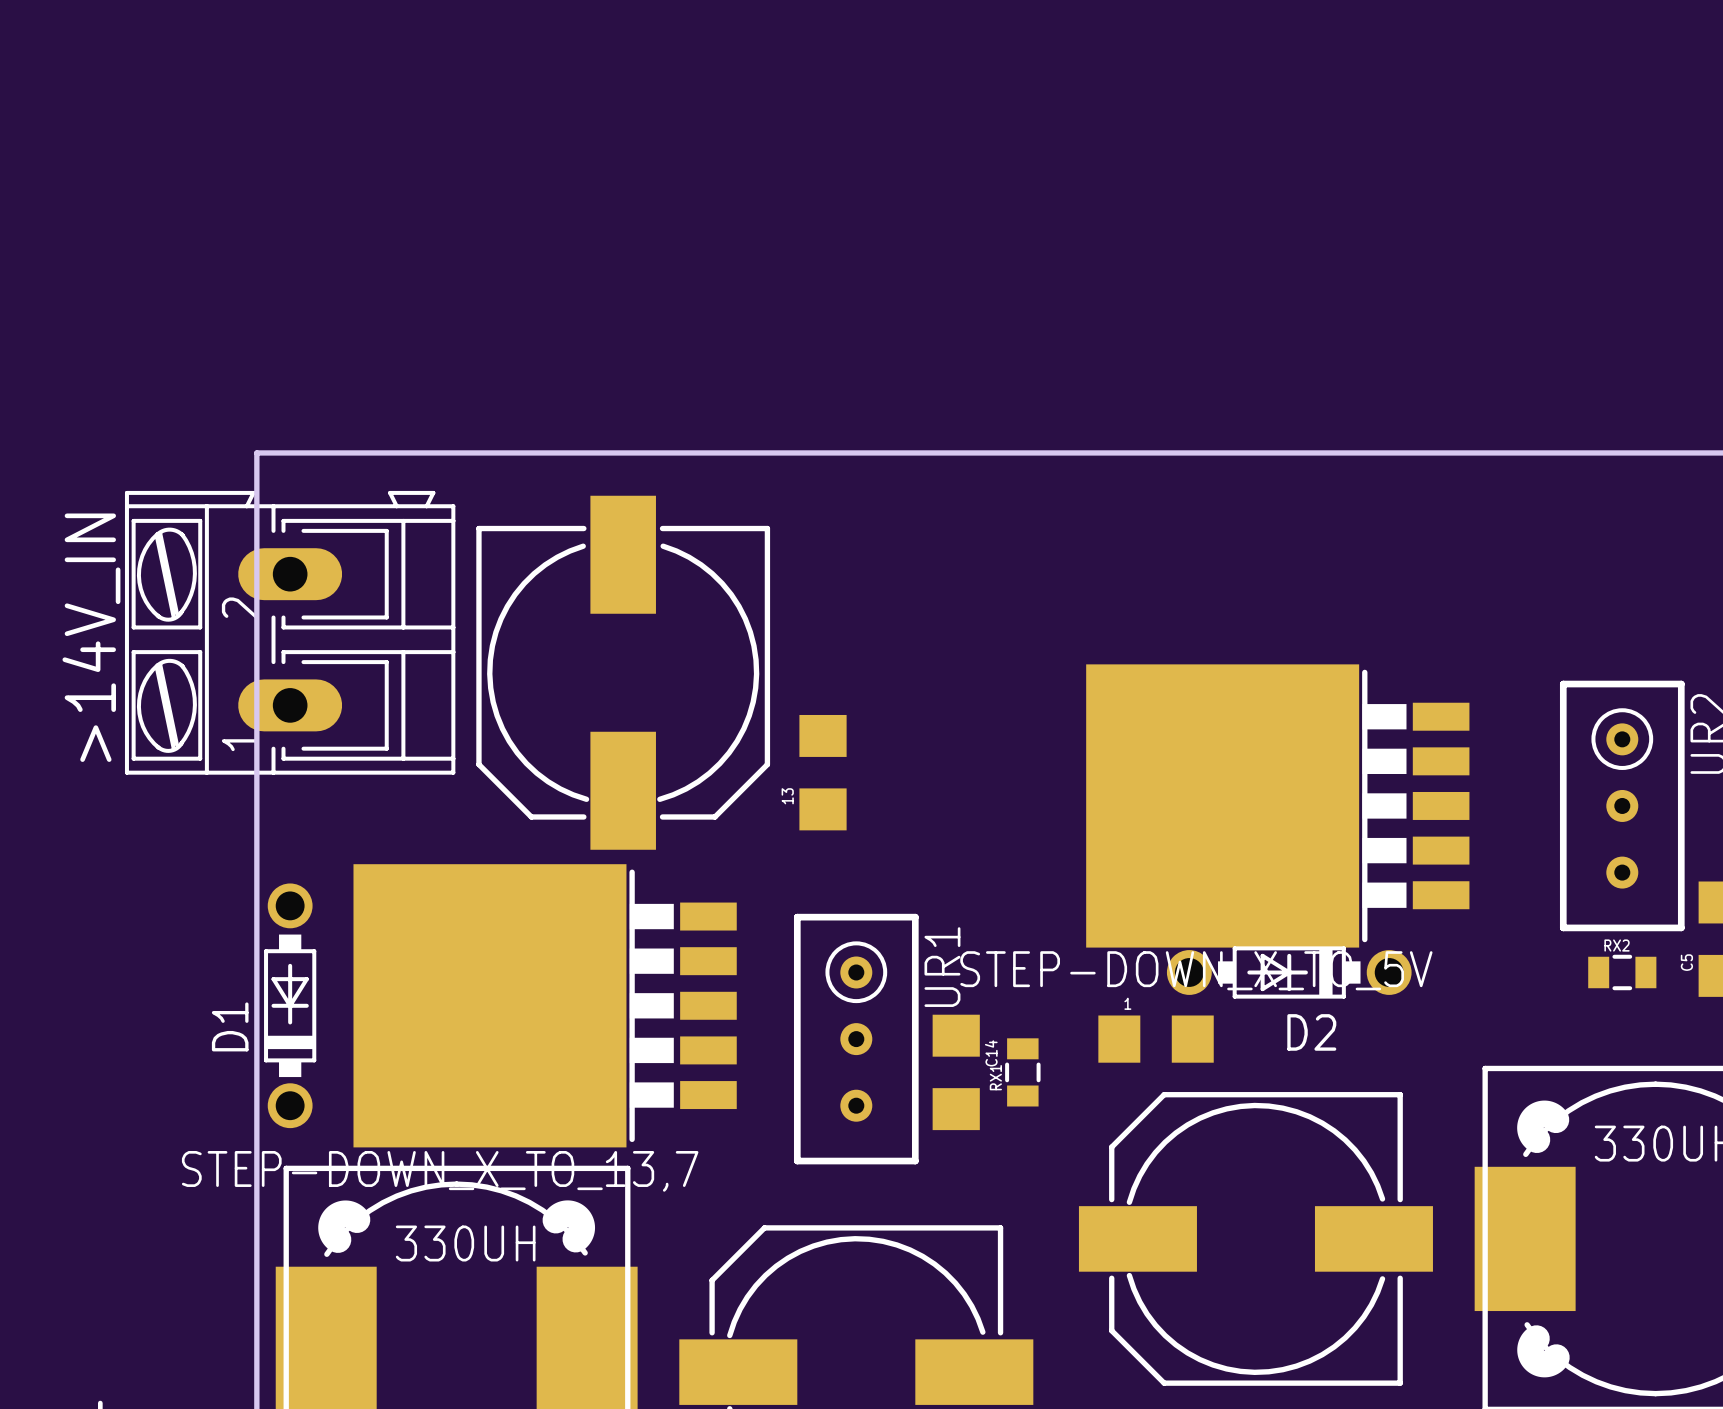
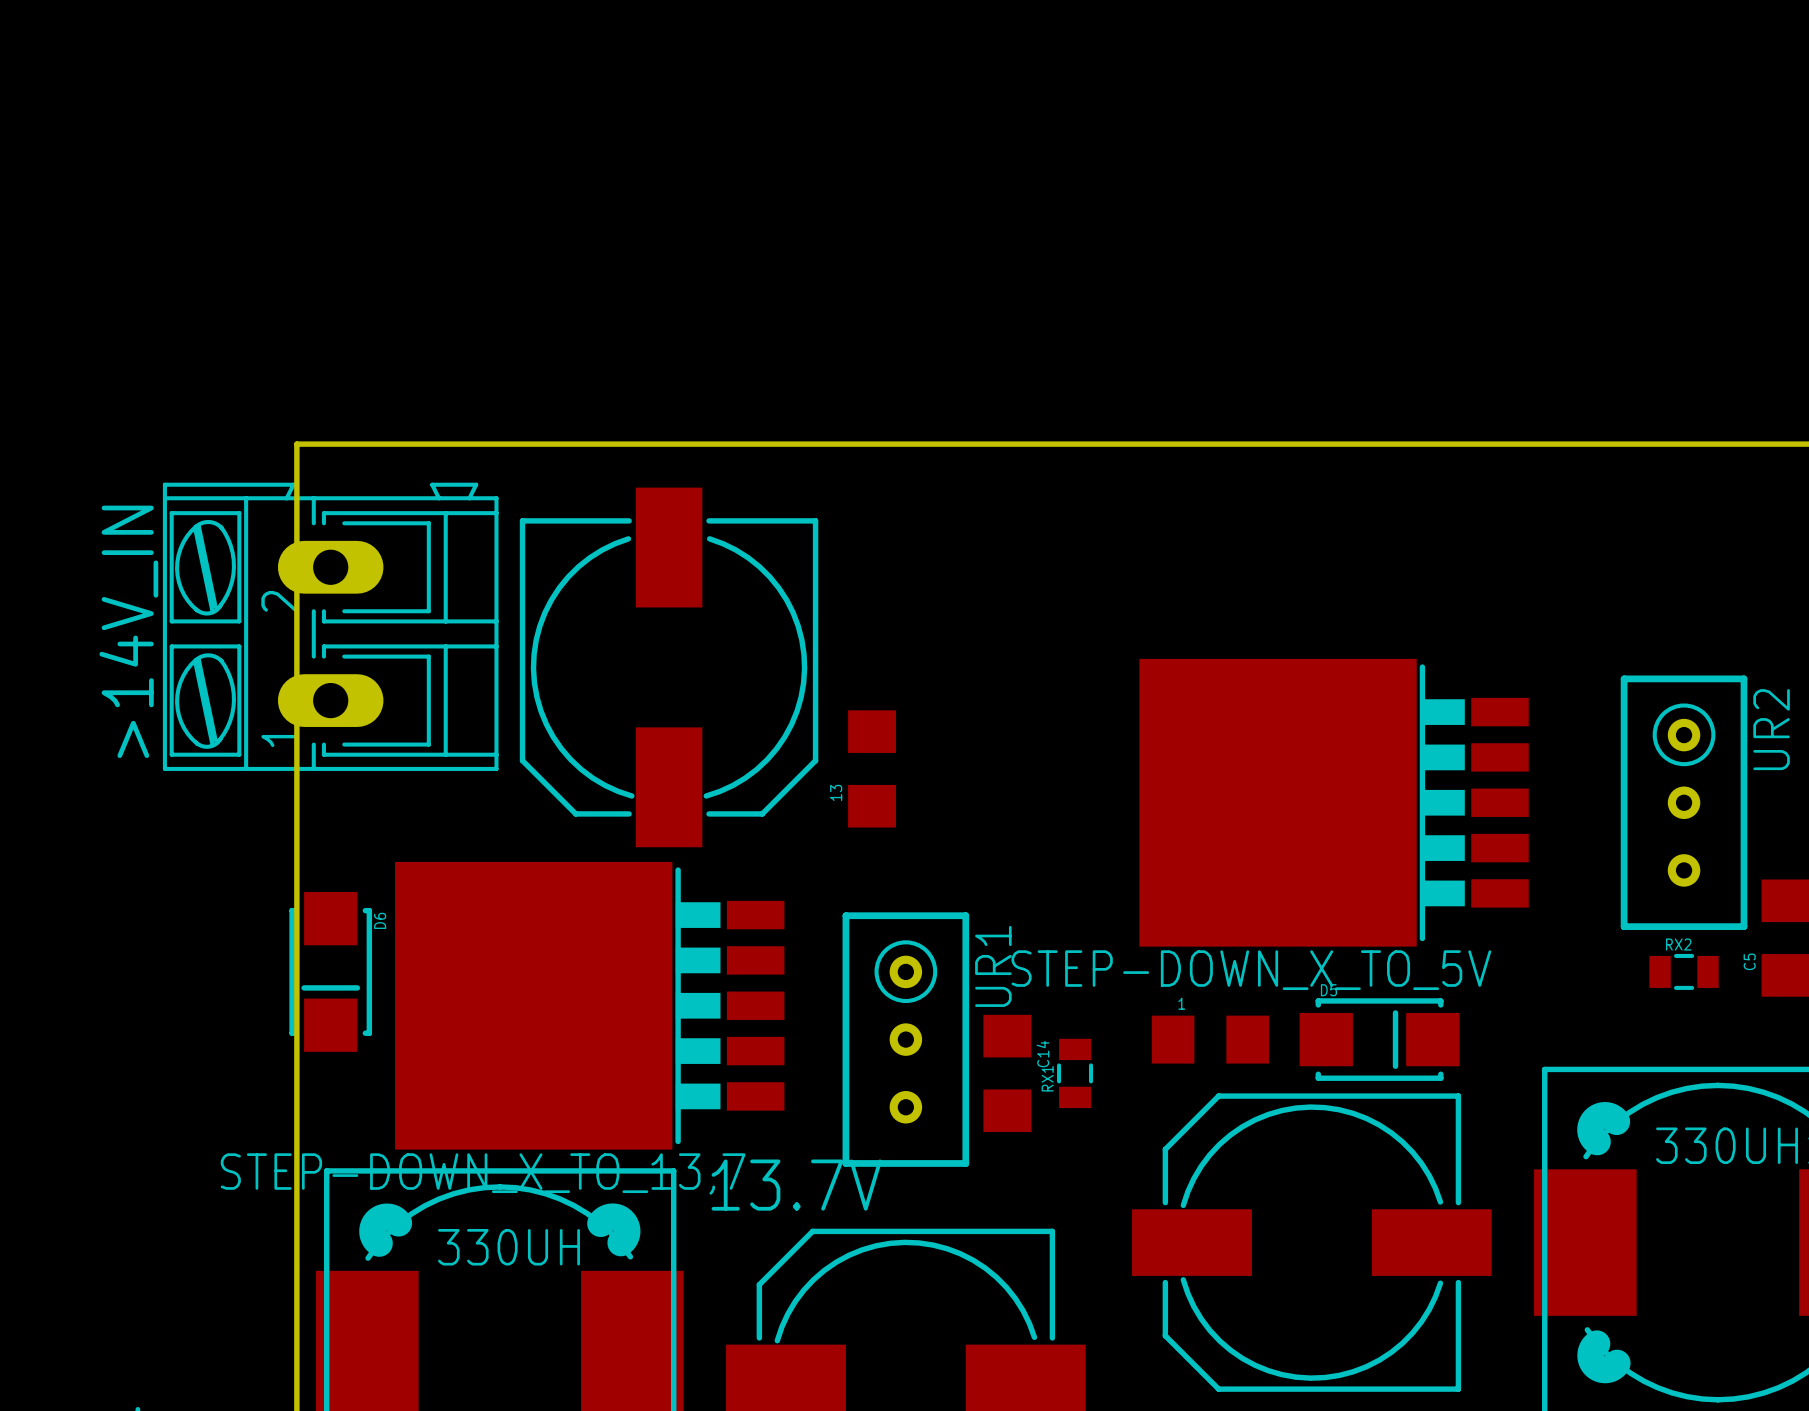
D6: none -> (330, 971)
D2: (1289, 972) -> none
D1: (290, 1005) -> none
D5: none -> (1379, 1039)
text: none -> 13.7V (796, 1185)

